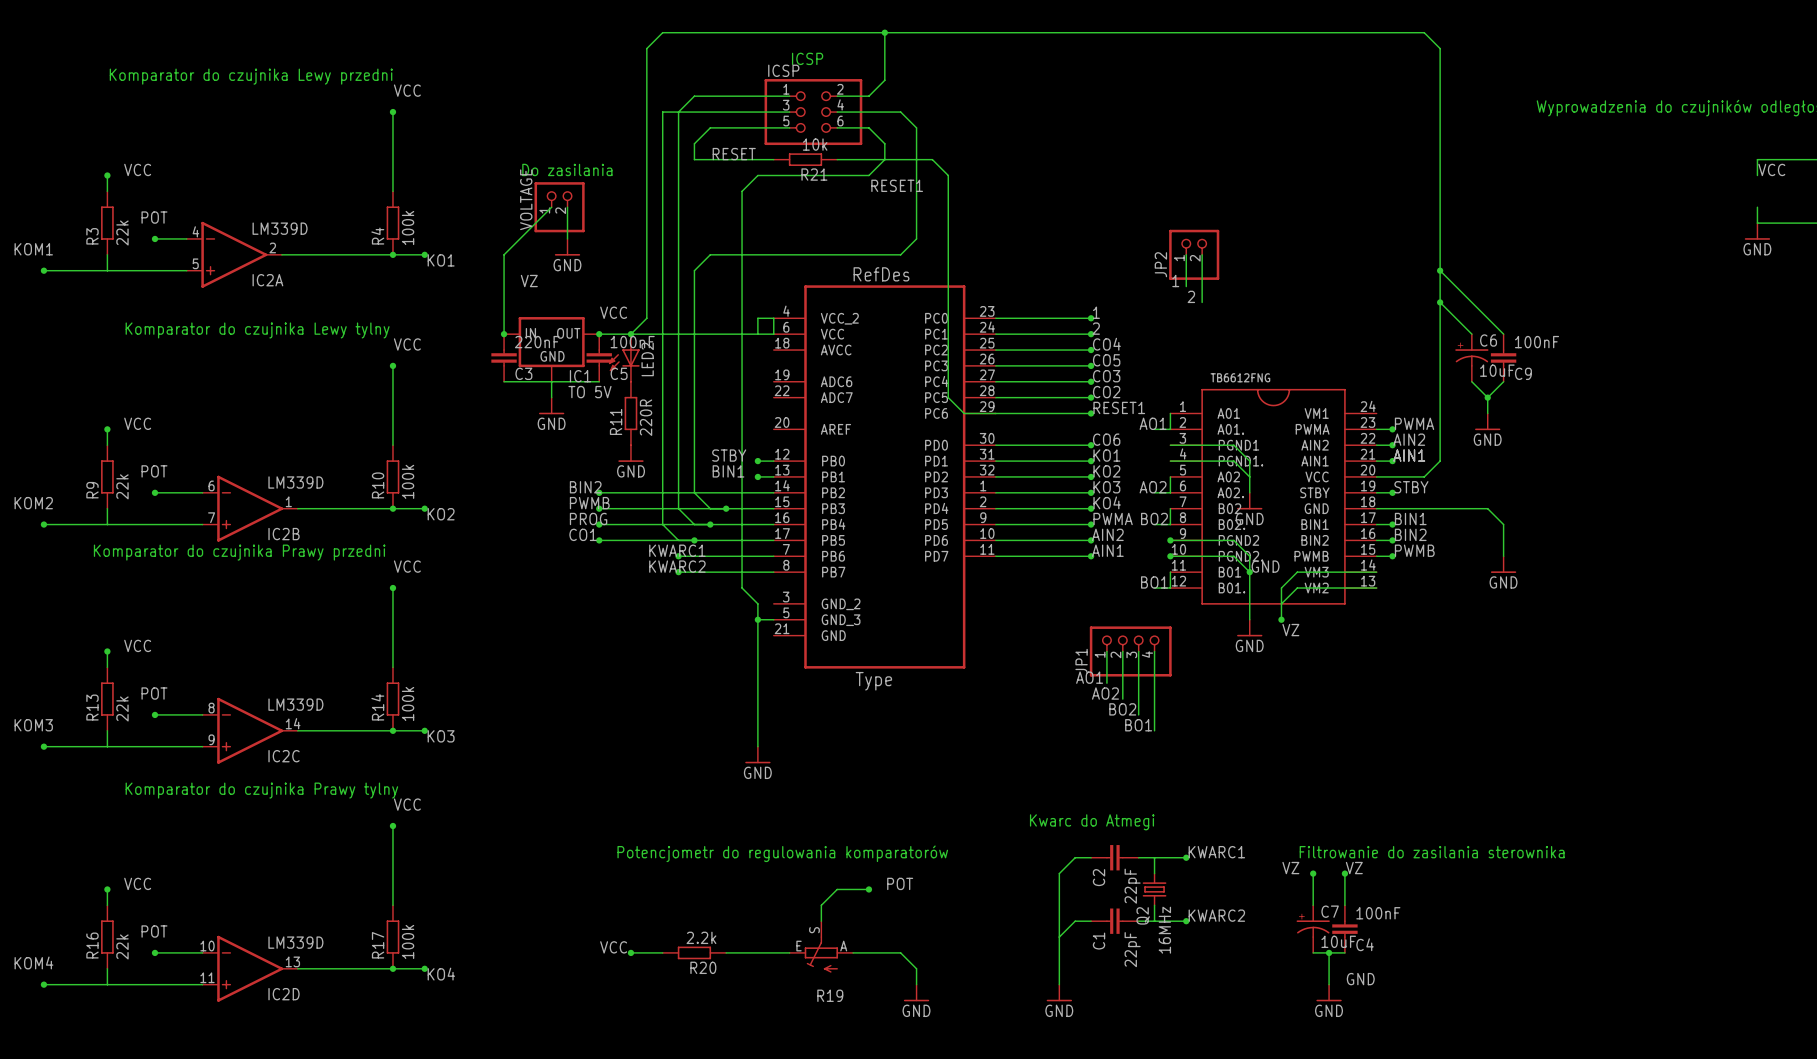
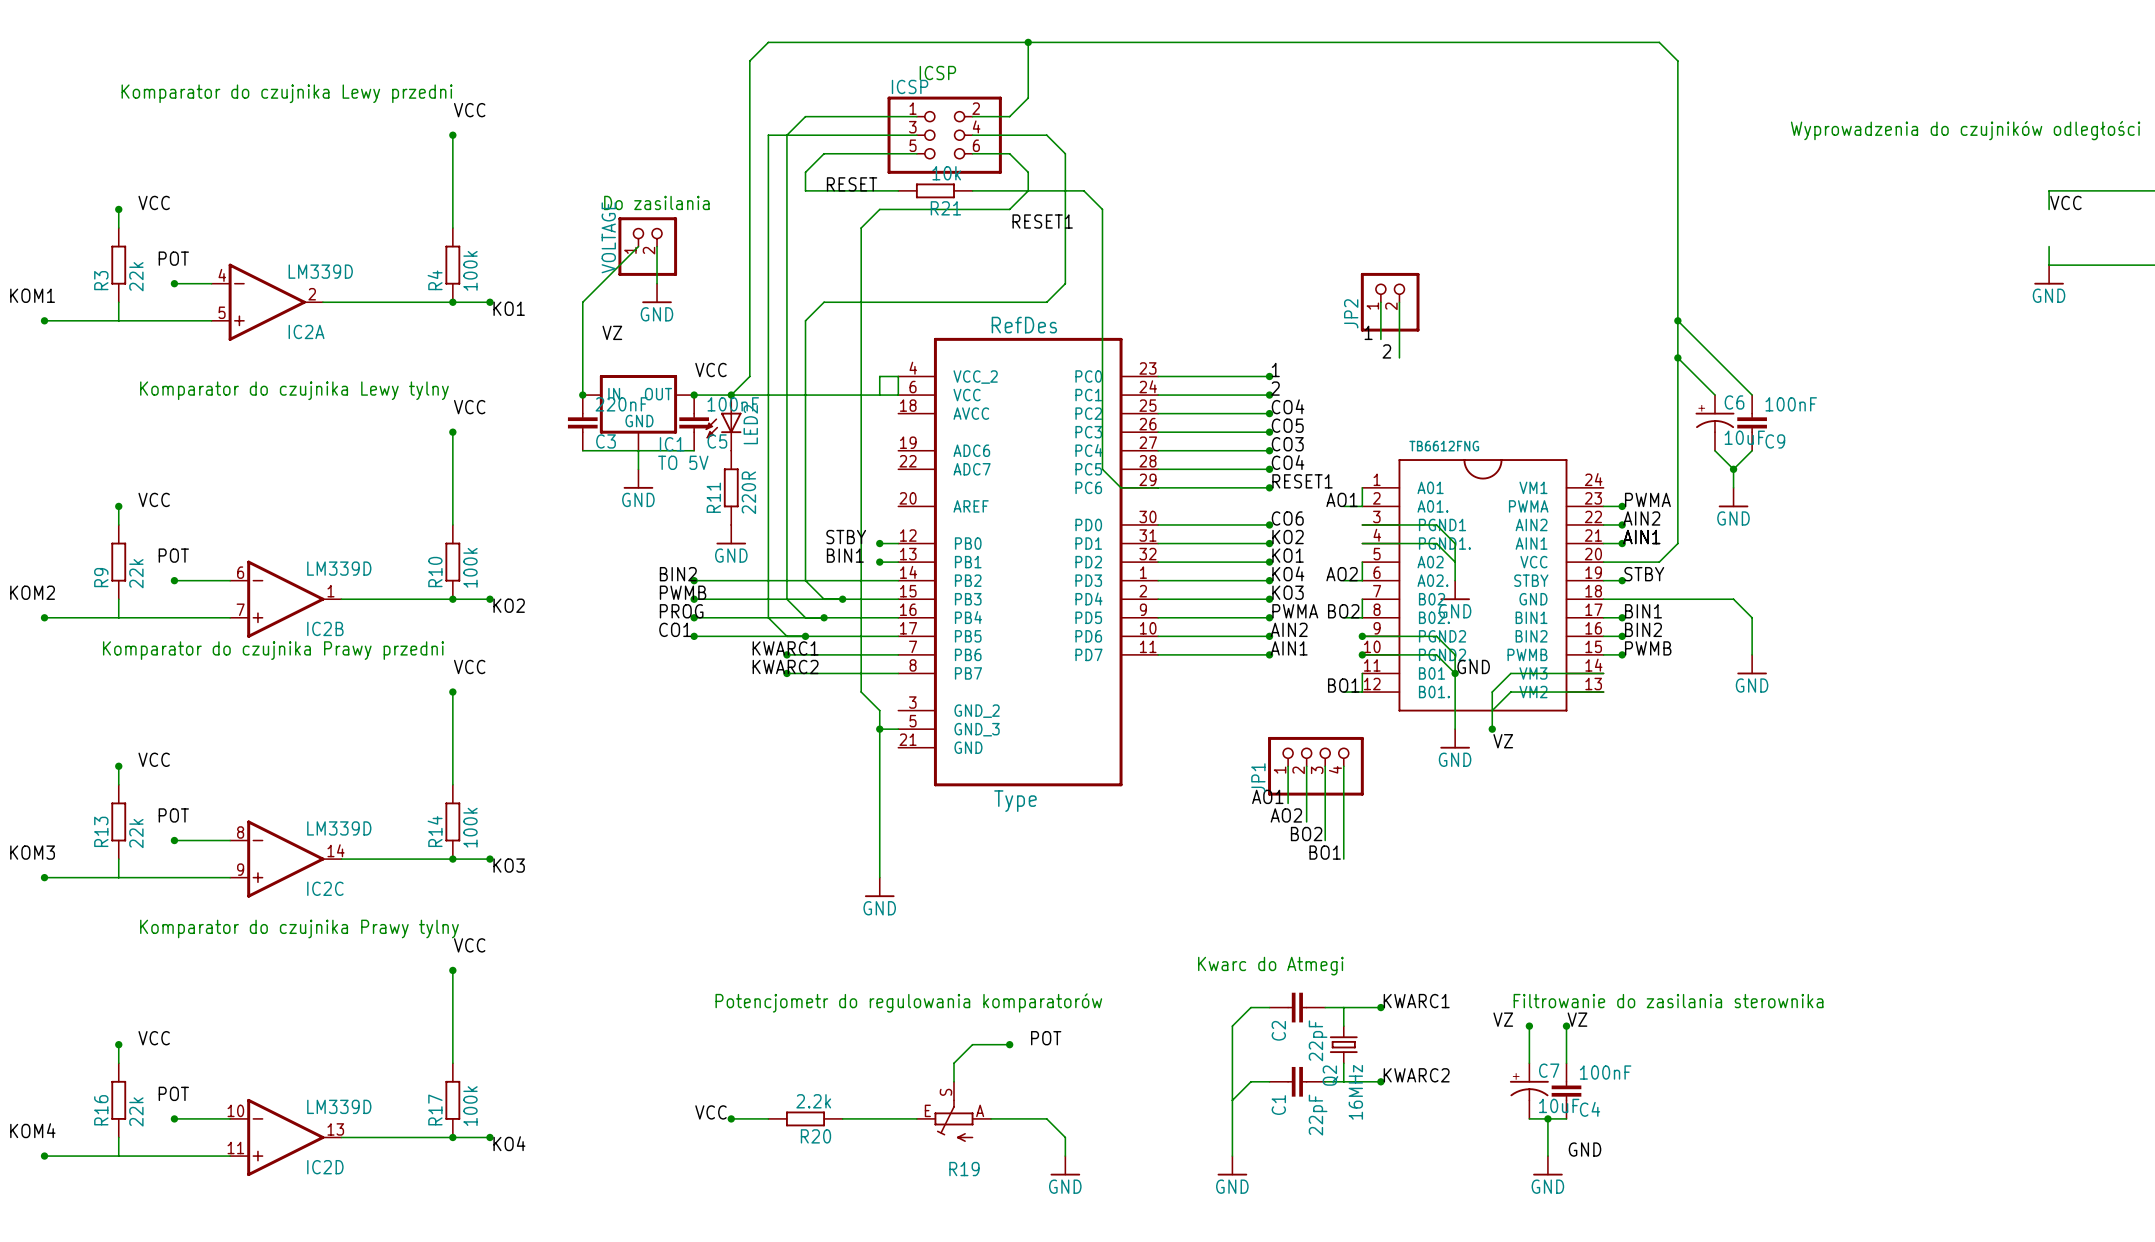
label: CO2 (1106, 392) -> CO4 (1288, 462)
label: KO1 (1106, 455) -> KO2 (1288, 537)
label: KO2 (1106, 471) -> KO1 (1288, 555)
label: KO3 (1106, 487) -> KO4 (1288, 573)
label: KO4 (1107, 502) -> KO3 (1288, 592)

